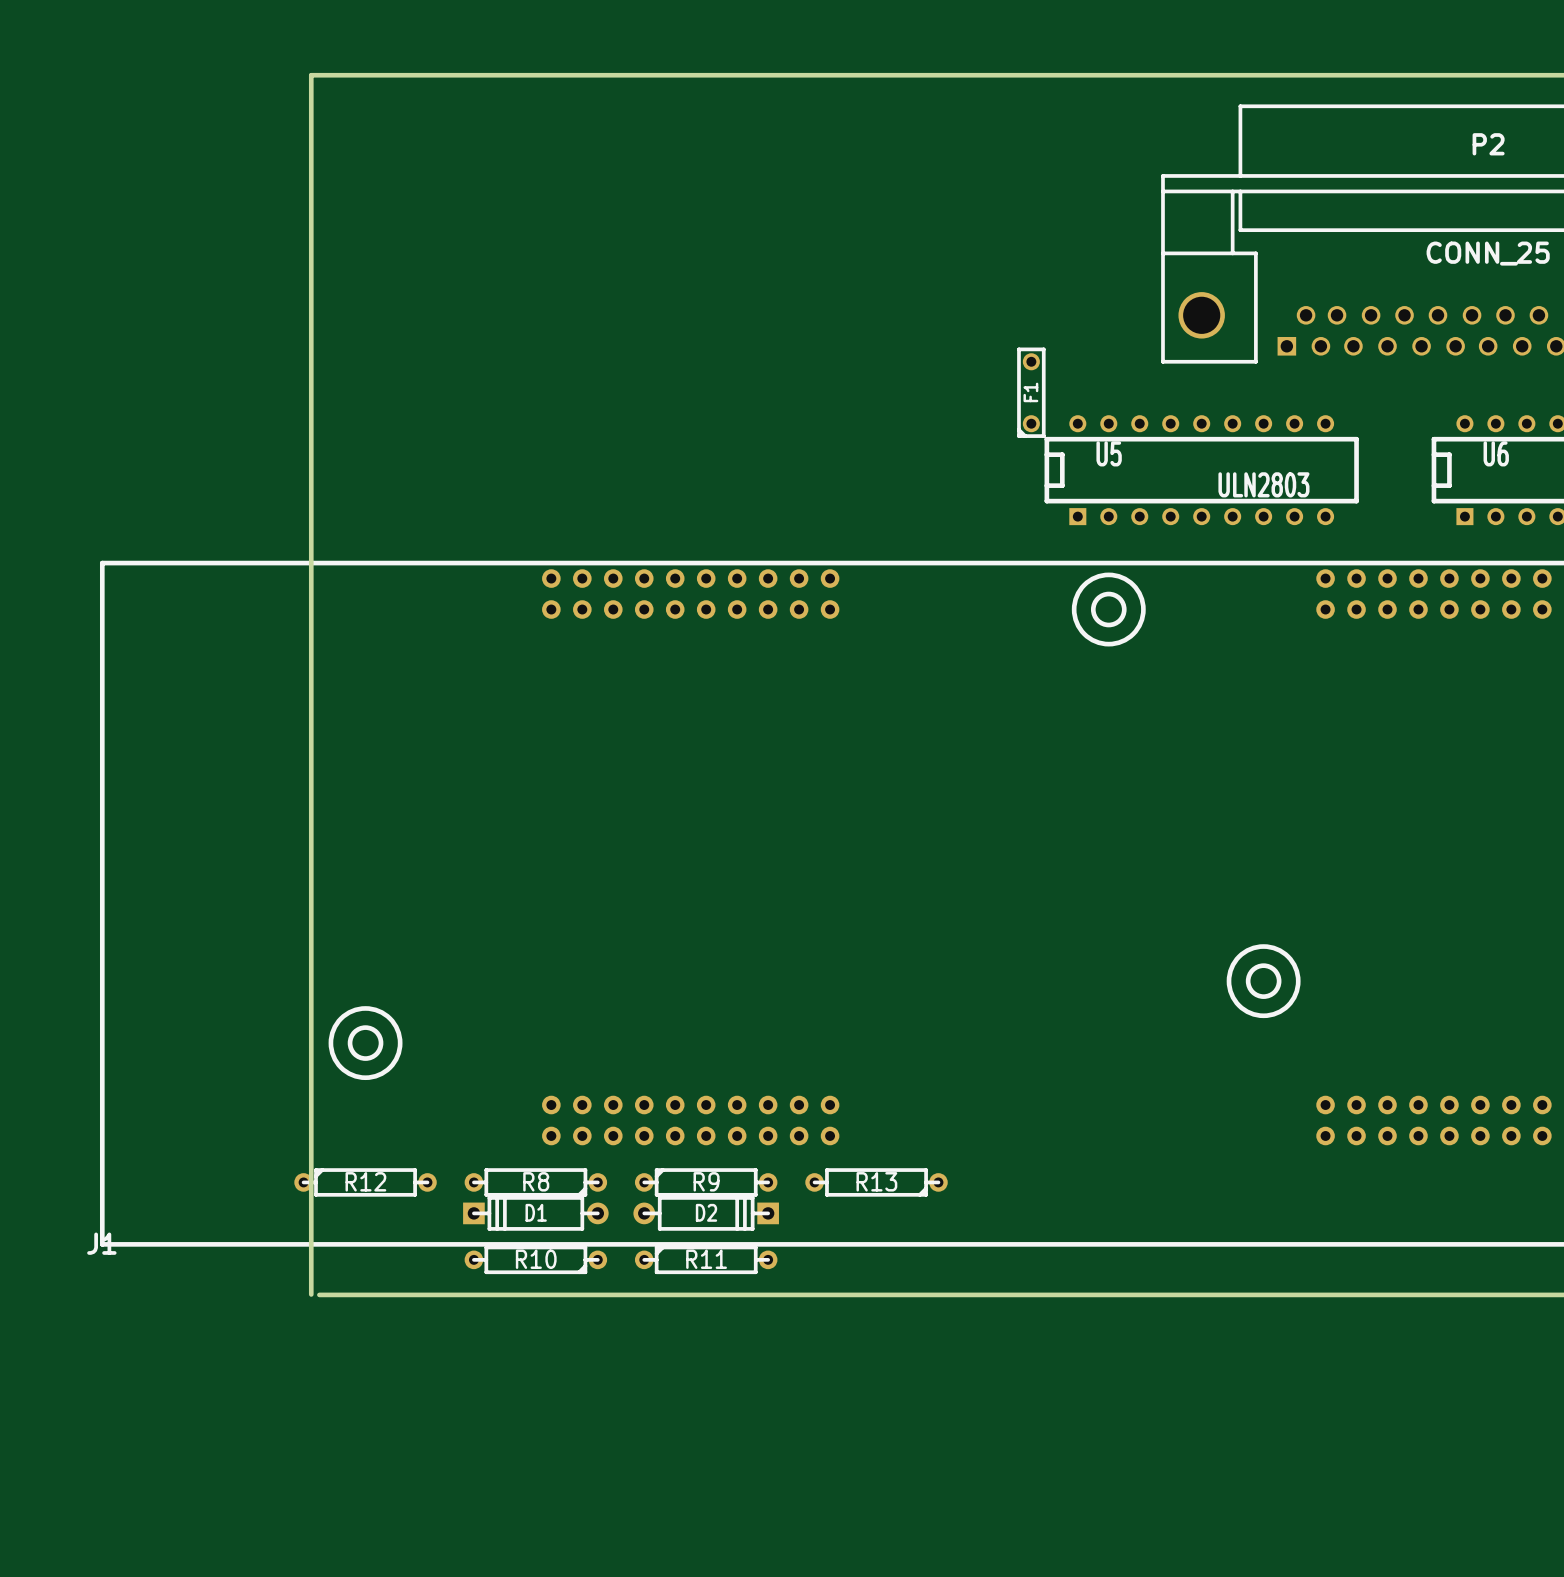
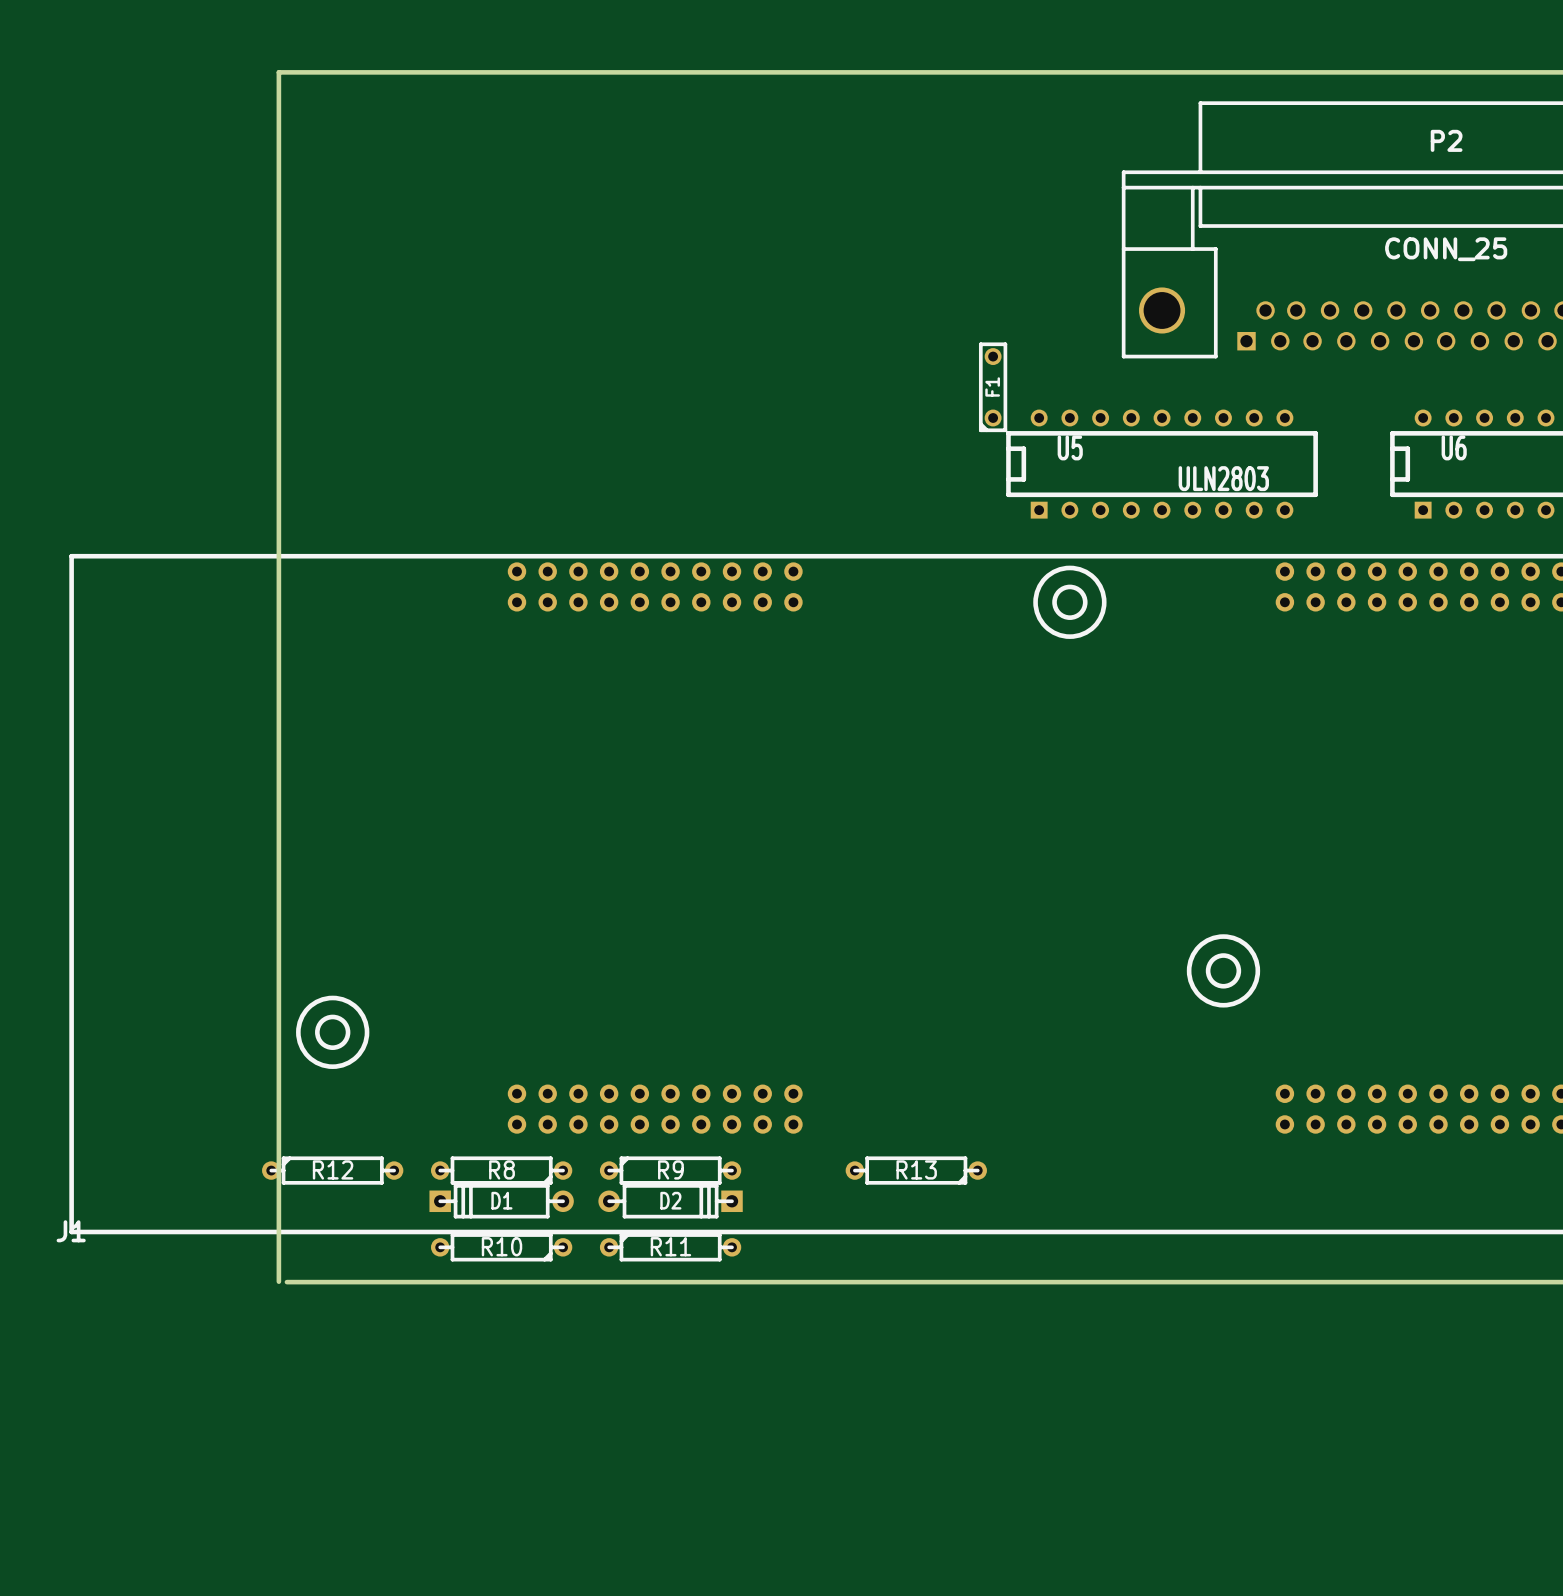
R13 position: (876, 1182) -> (916, 1170)

